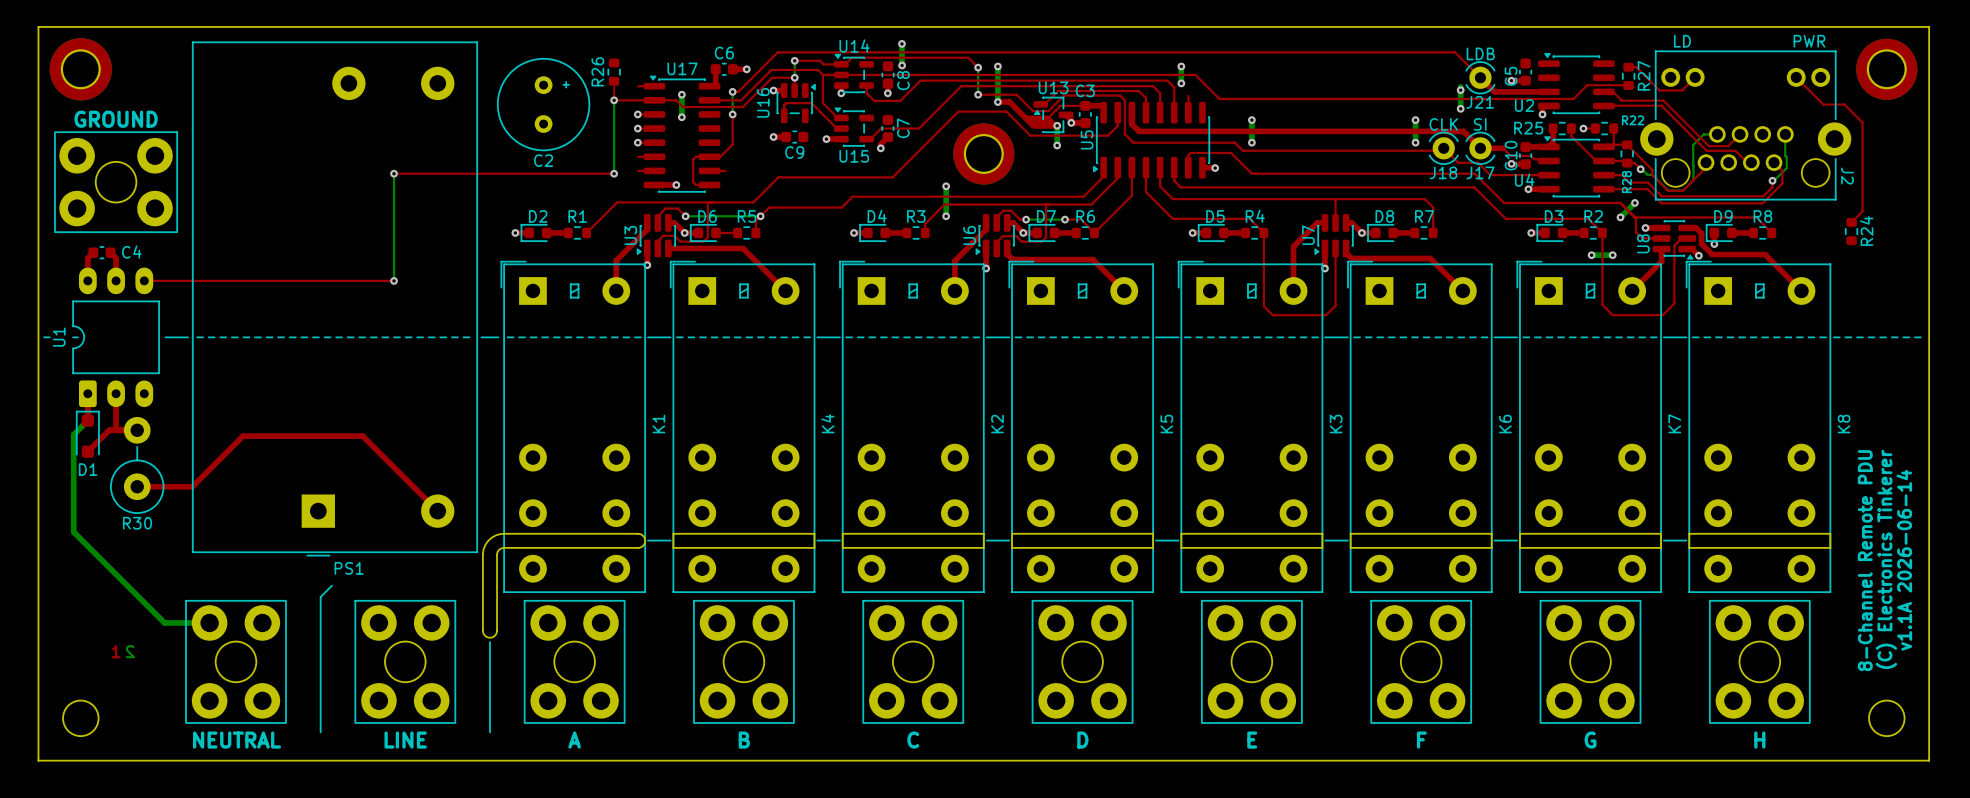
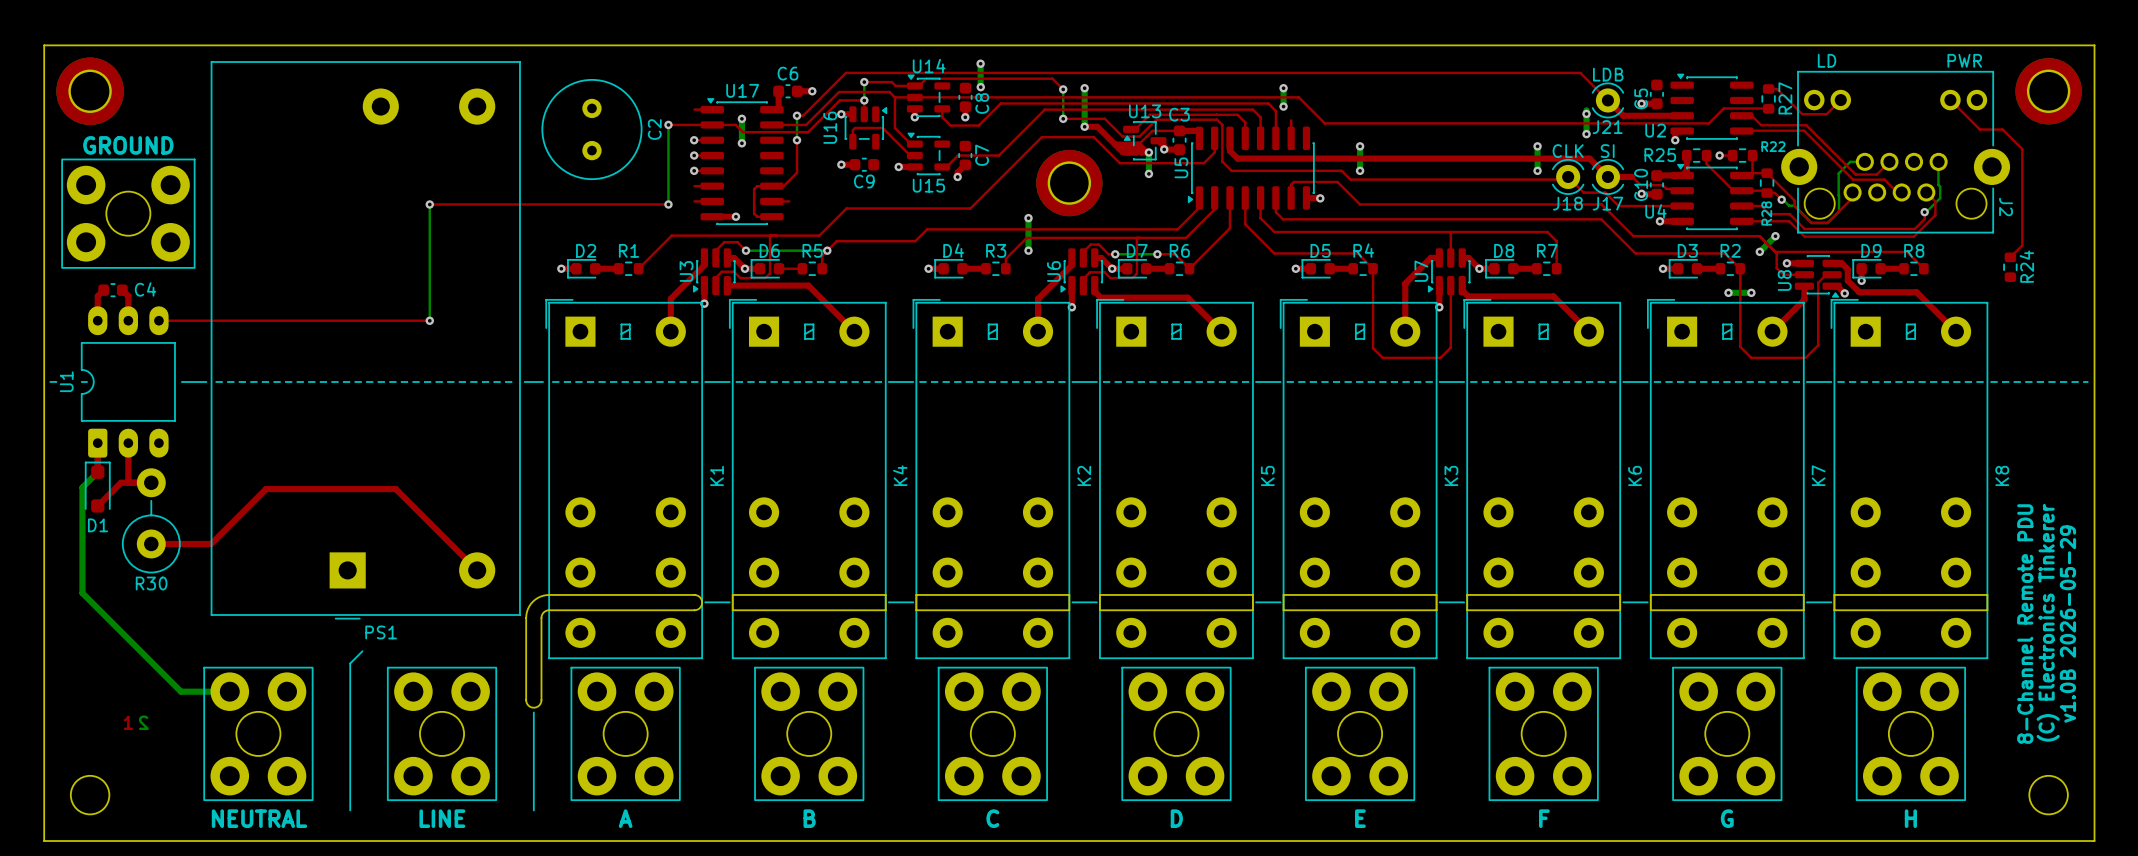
R26: (614, 72) -> none
top track: (614, 81) (614, 100) -> none
line: (566, 82) (566, 87) -> none
line: (563, 84) (568, 84) -> none
C2 name rotation: 0° (543, 160) -> 90° counterclockwise (654, 129)
C2 name position: C2 (543, 160) -> C2 (654, 129)
text: v1.1A 2026-06-14 (1904, 560) -> v1.0B 2026-05-29 (2067, 624)

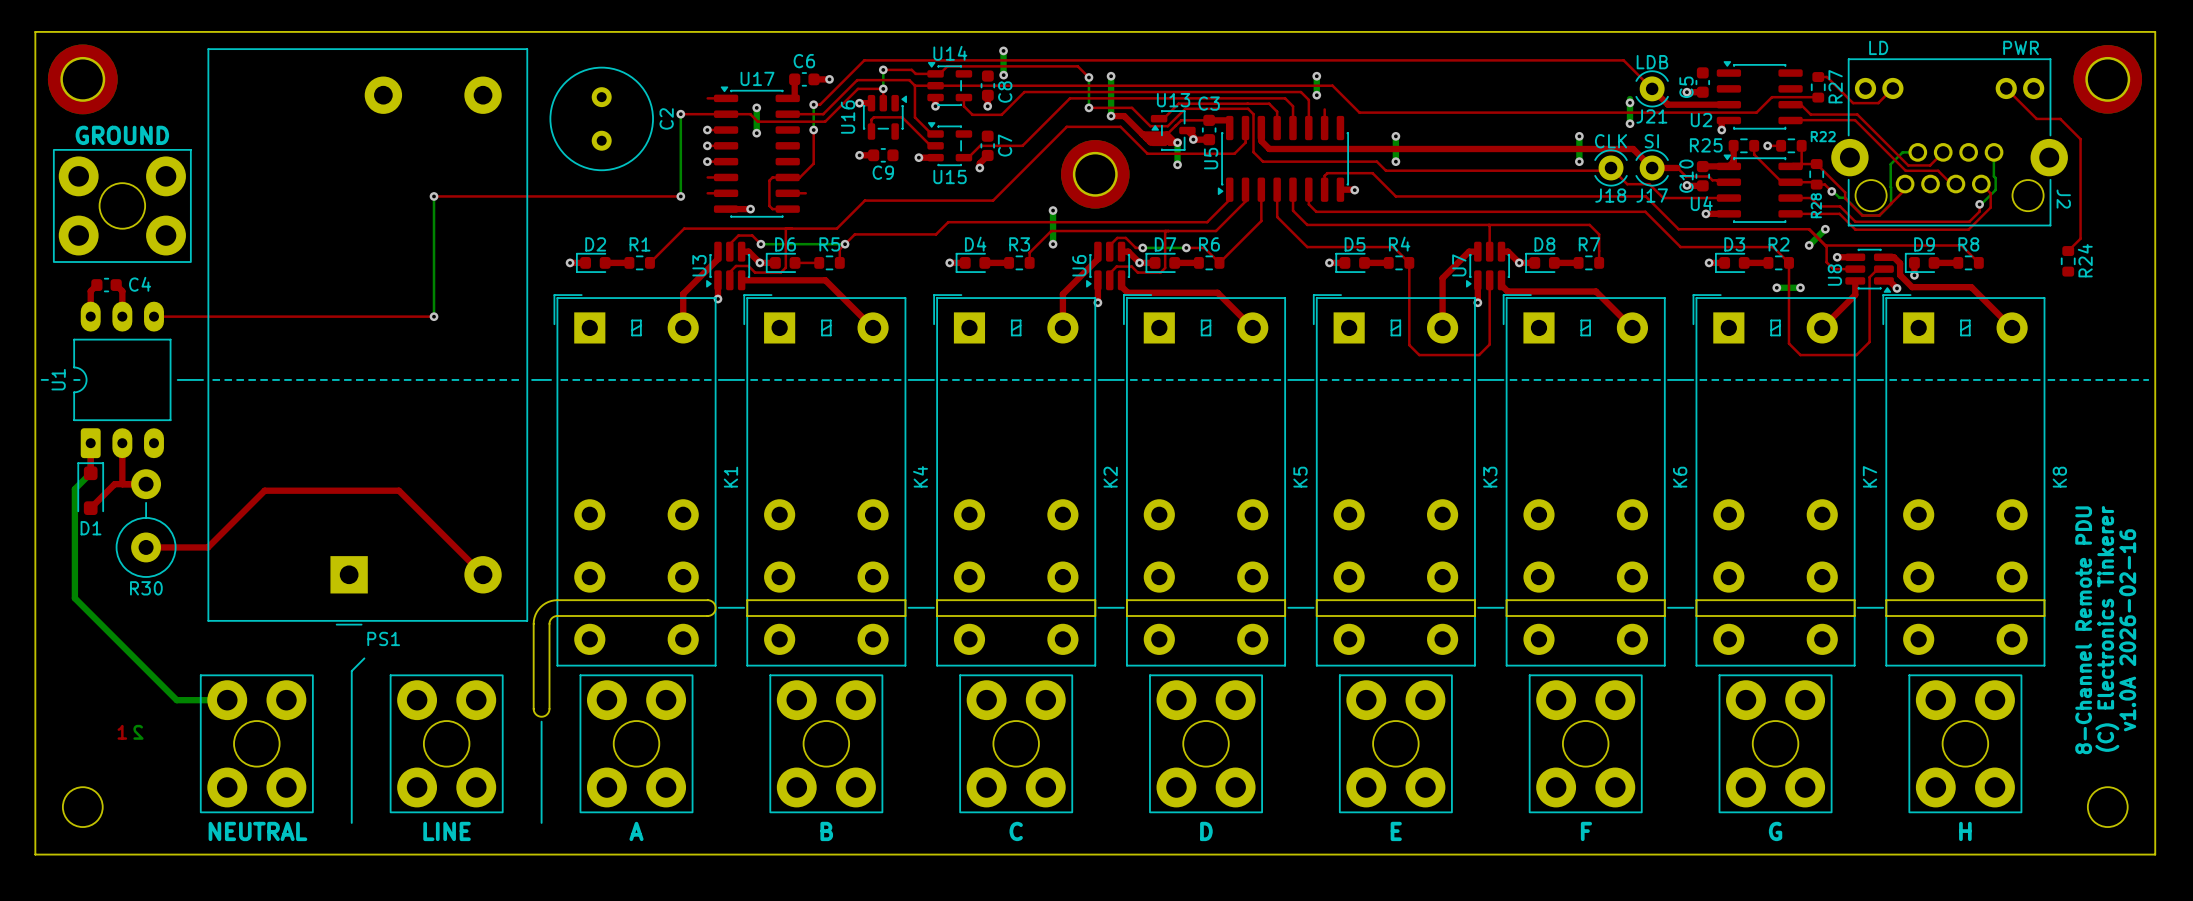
text: v1.0B 2026-05-29 (2067, 624) -> v1.0A 2026-02-16 (2127, 630)

